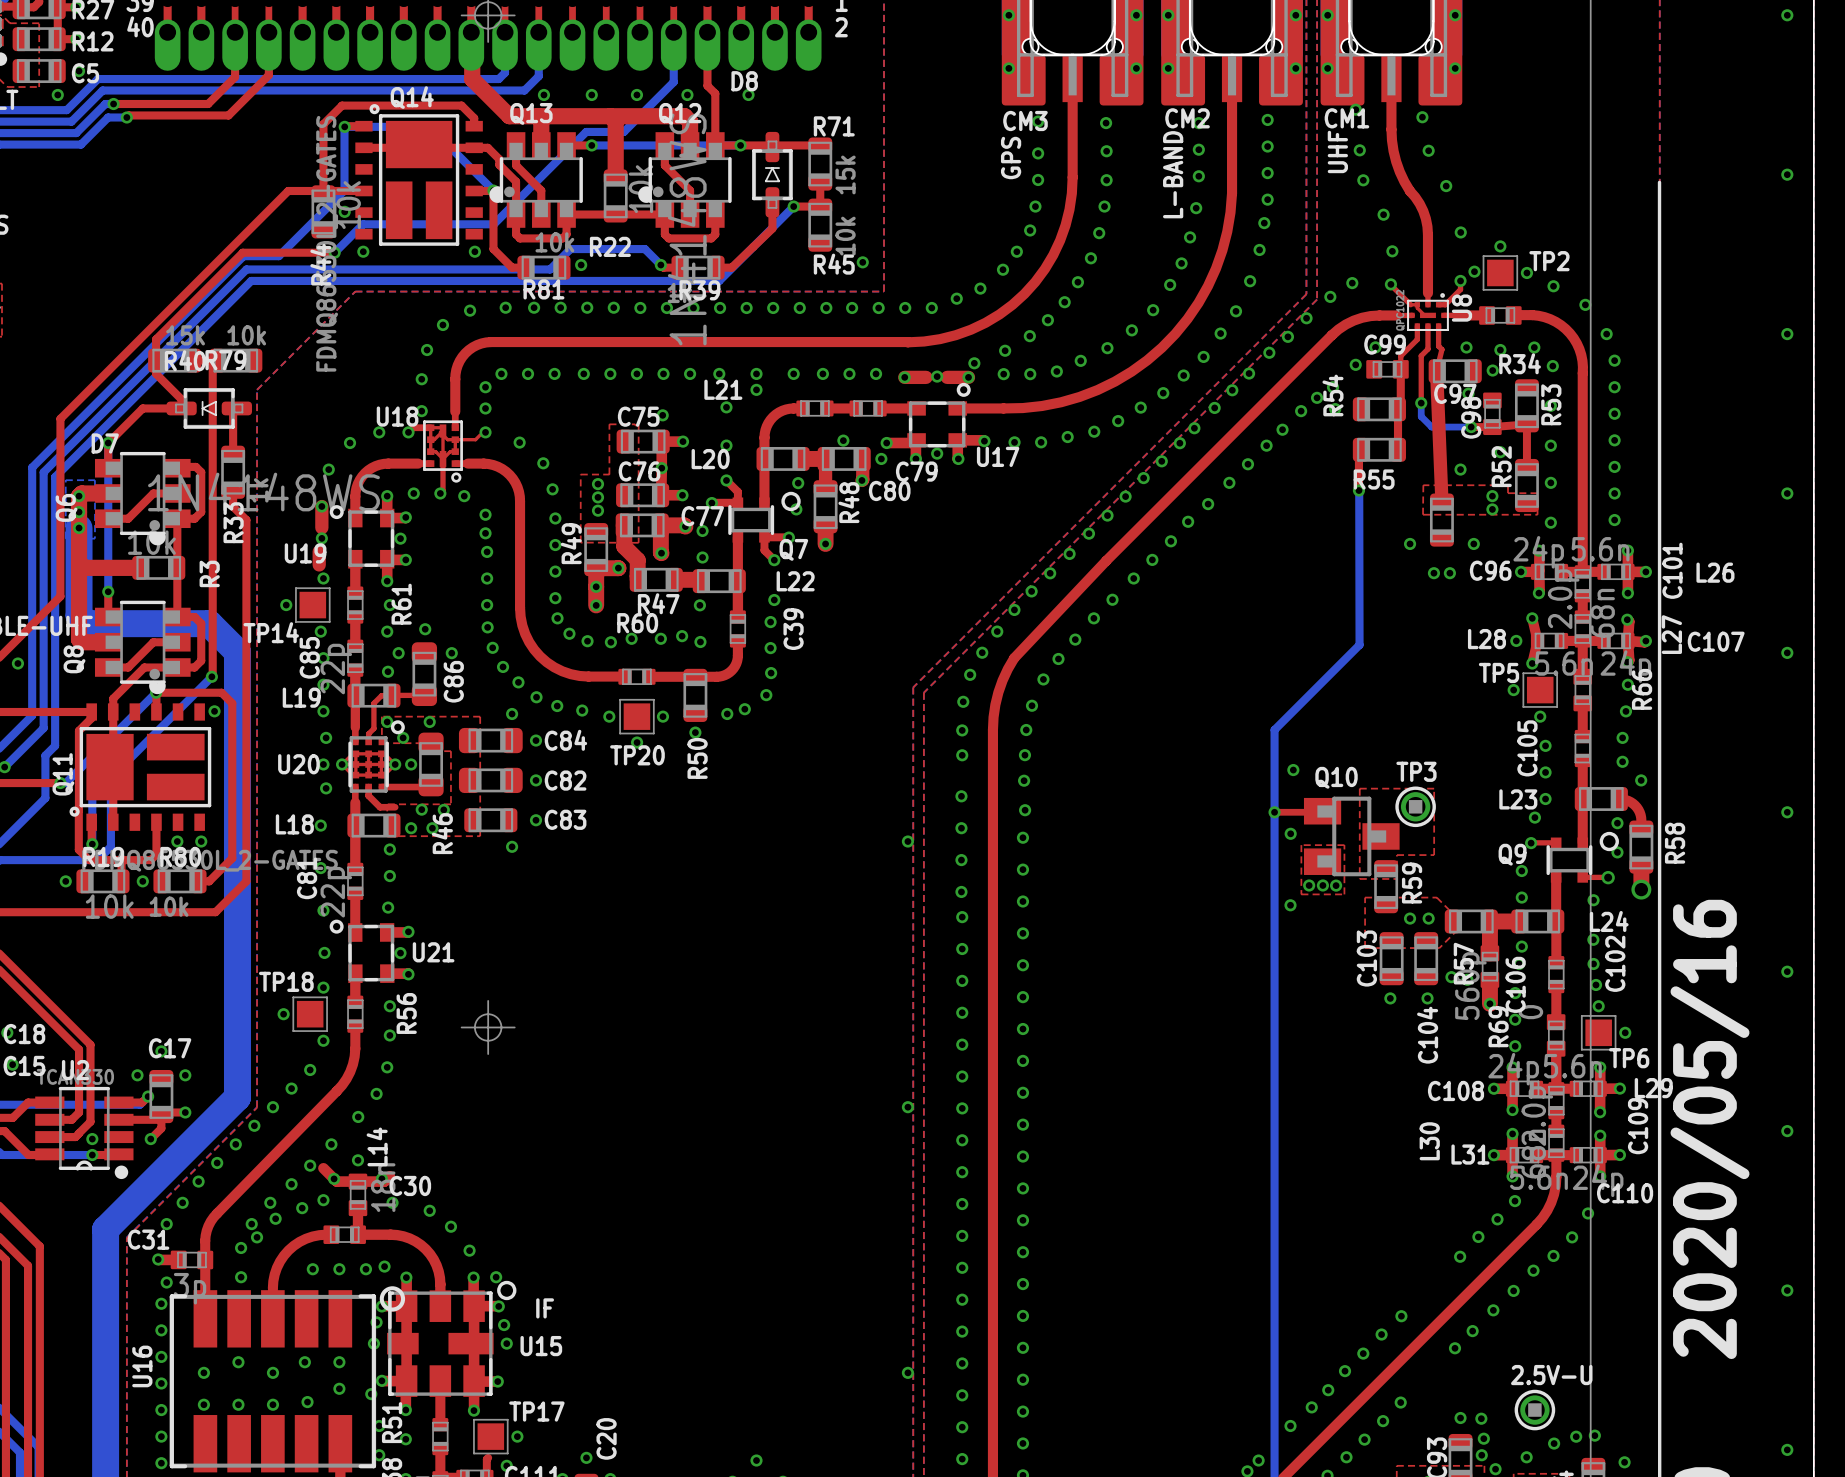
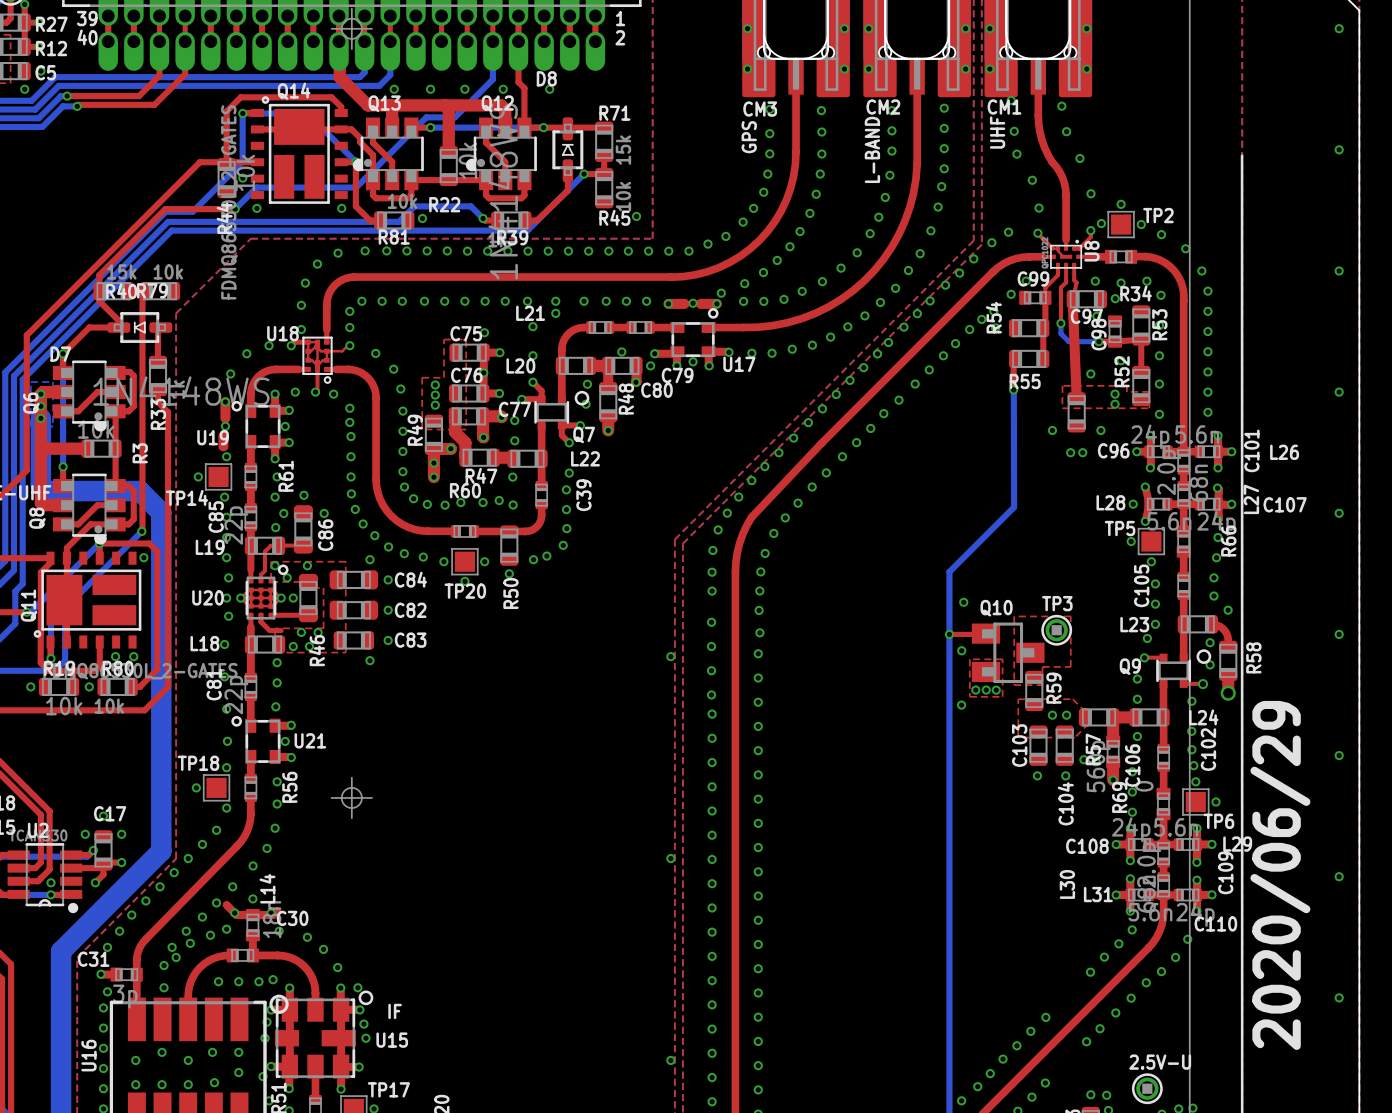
text: 2020/05/16 (1710, 1129) -> 2020/06/29 (1280, 875)

